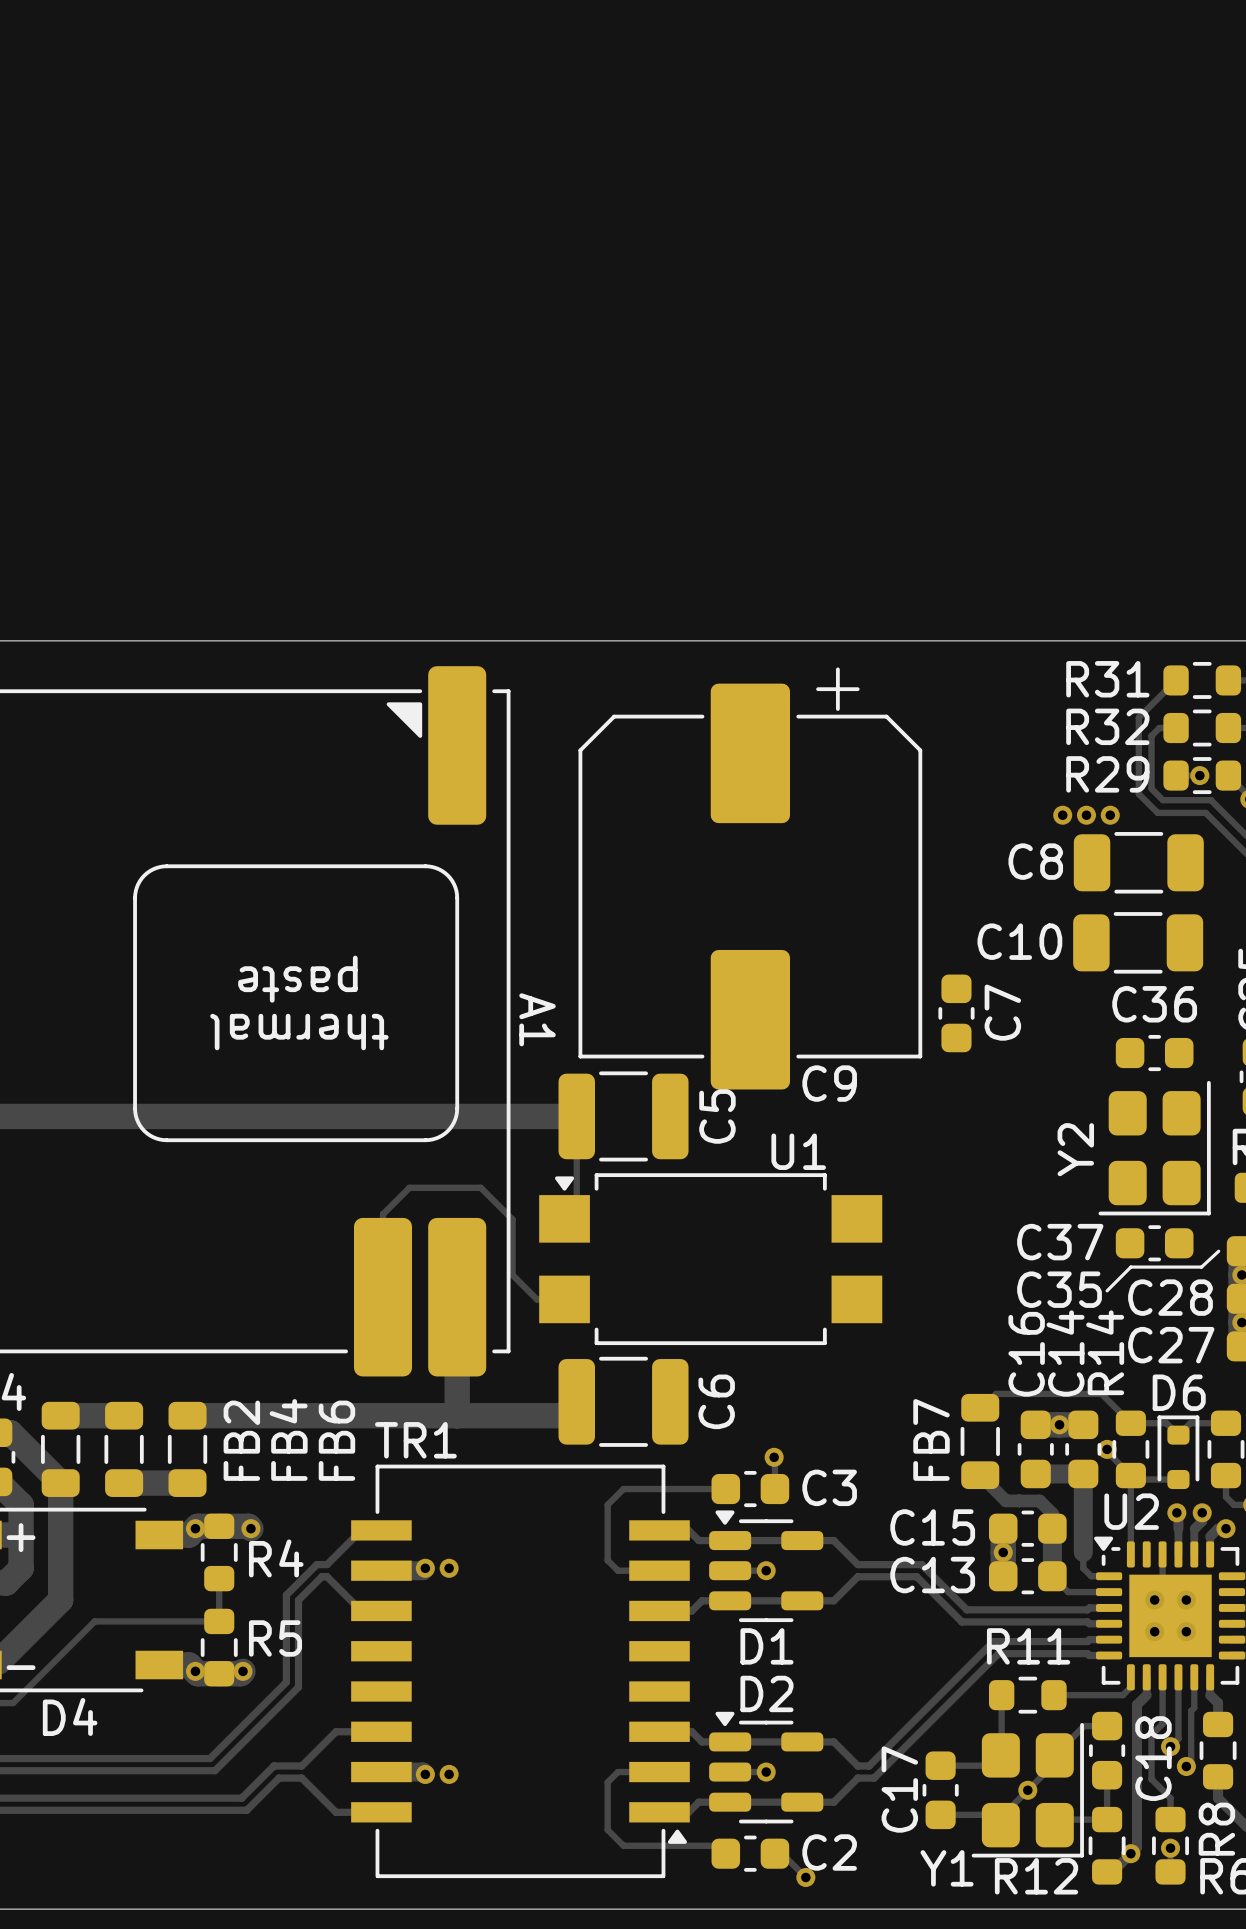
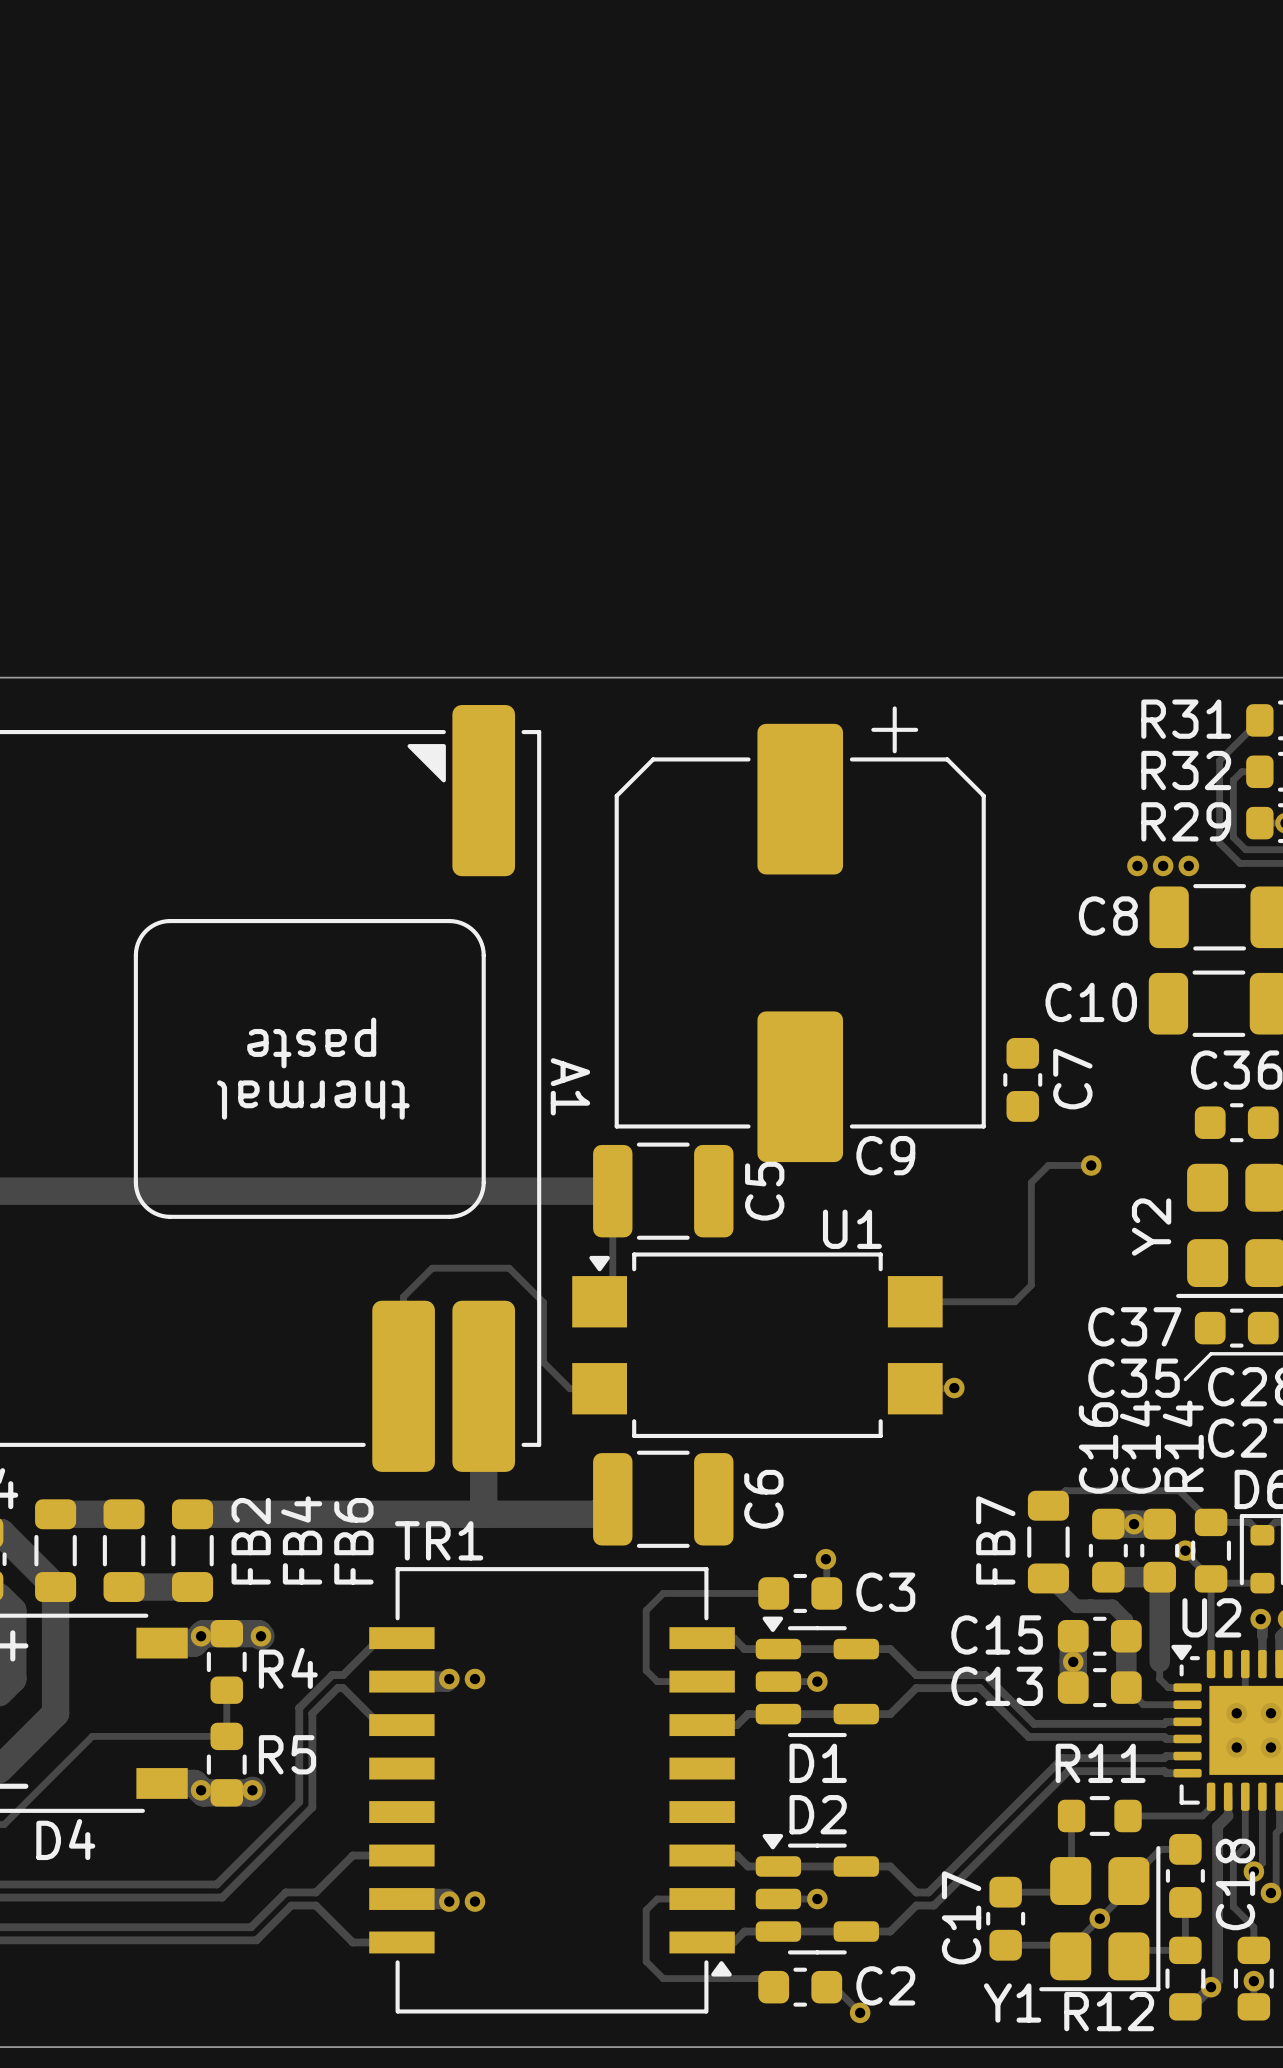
track: none -> (1091, 1165) (1048, 1165) (1031, 1182) (1031, 1285) (1014, 1301) (915, 1301)
via: none -> (1091, 1165)
via: none -> (954, 1388)

